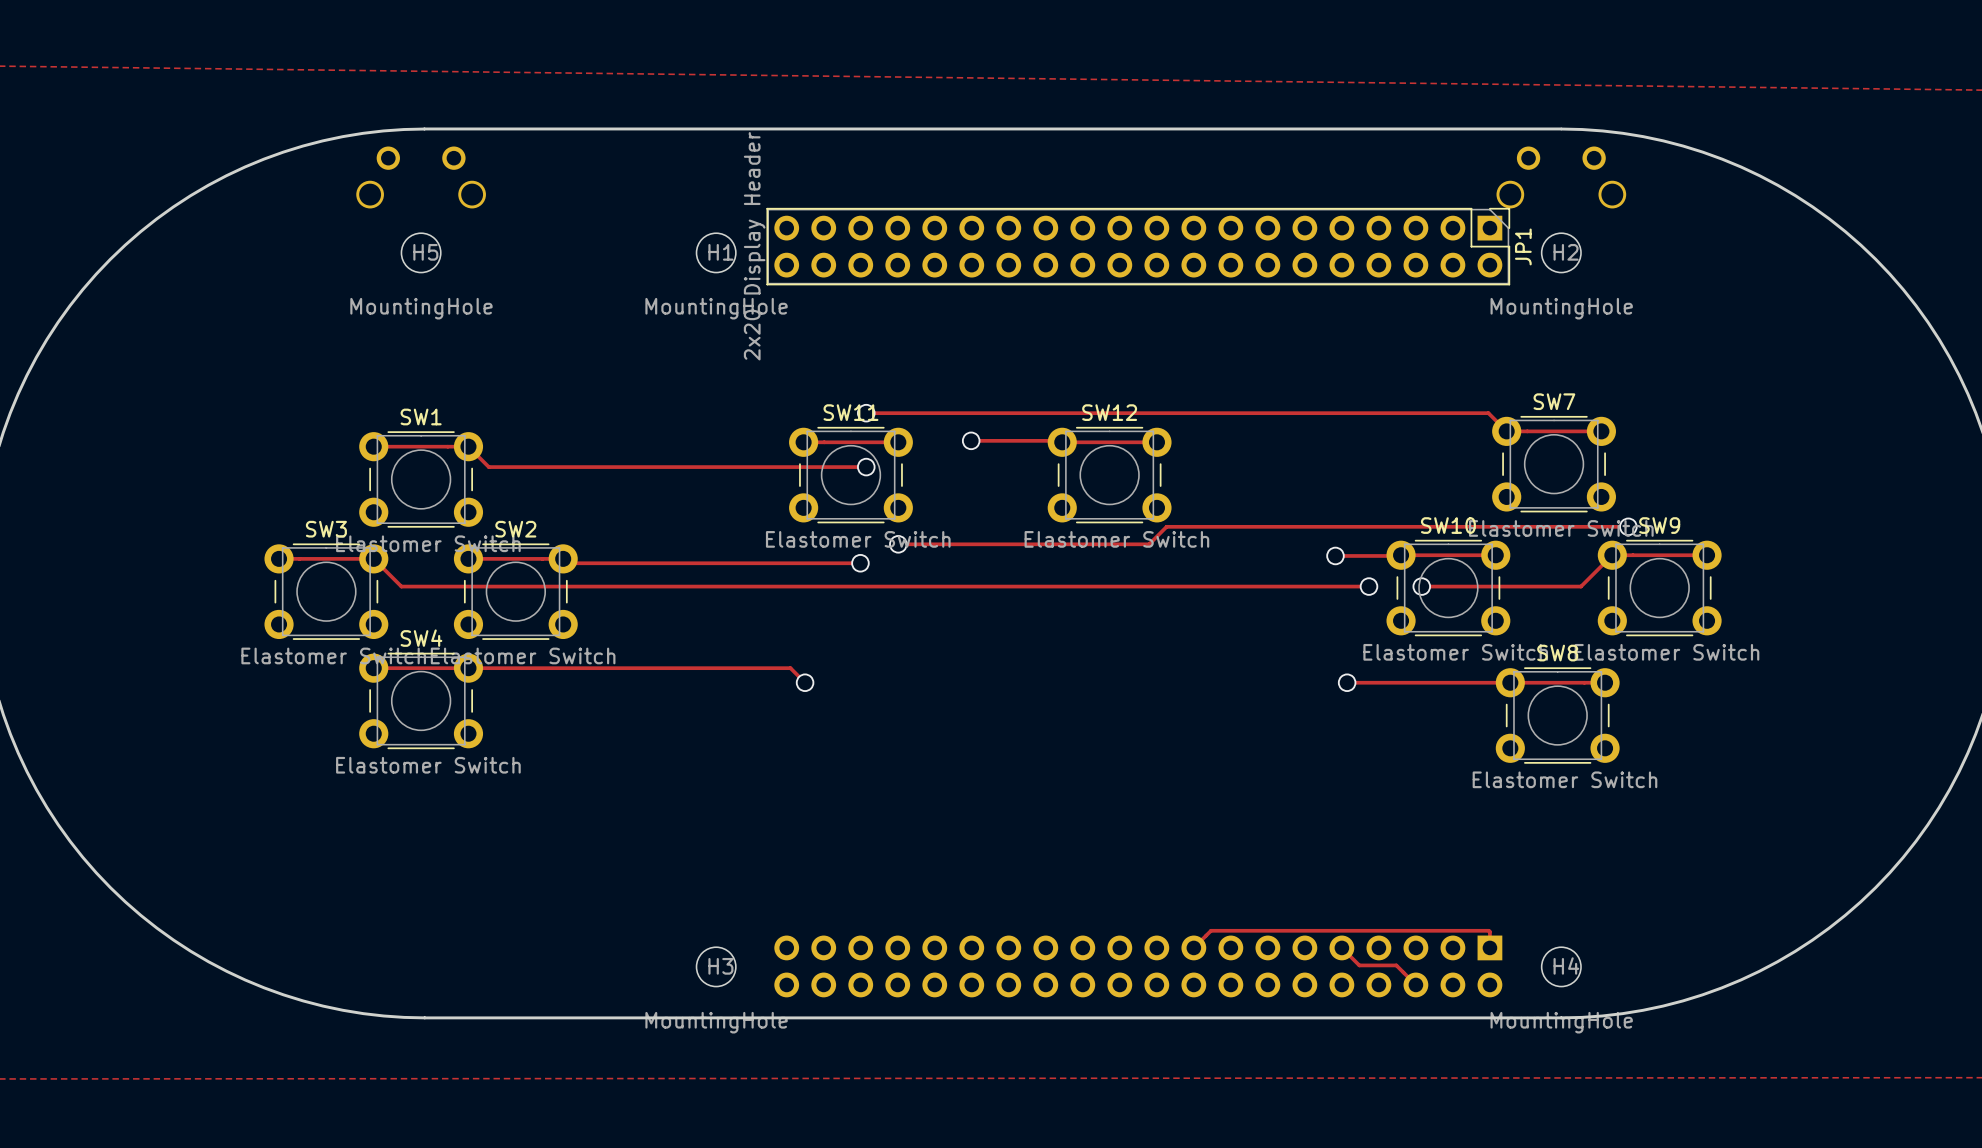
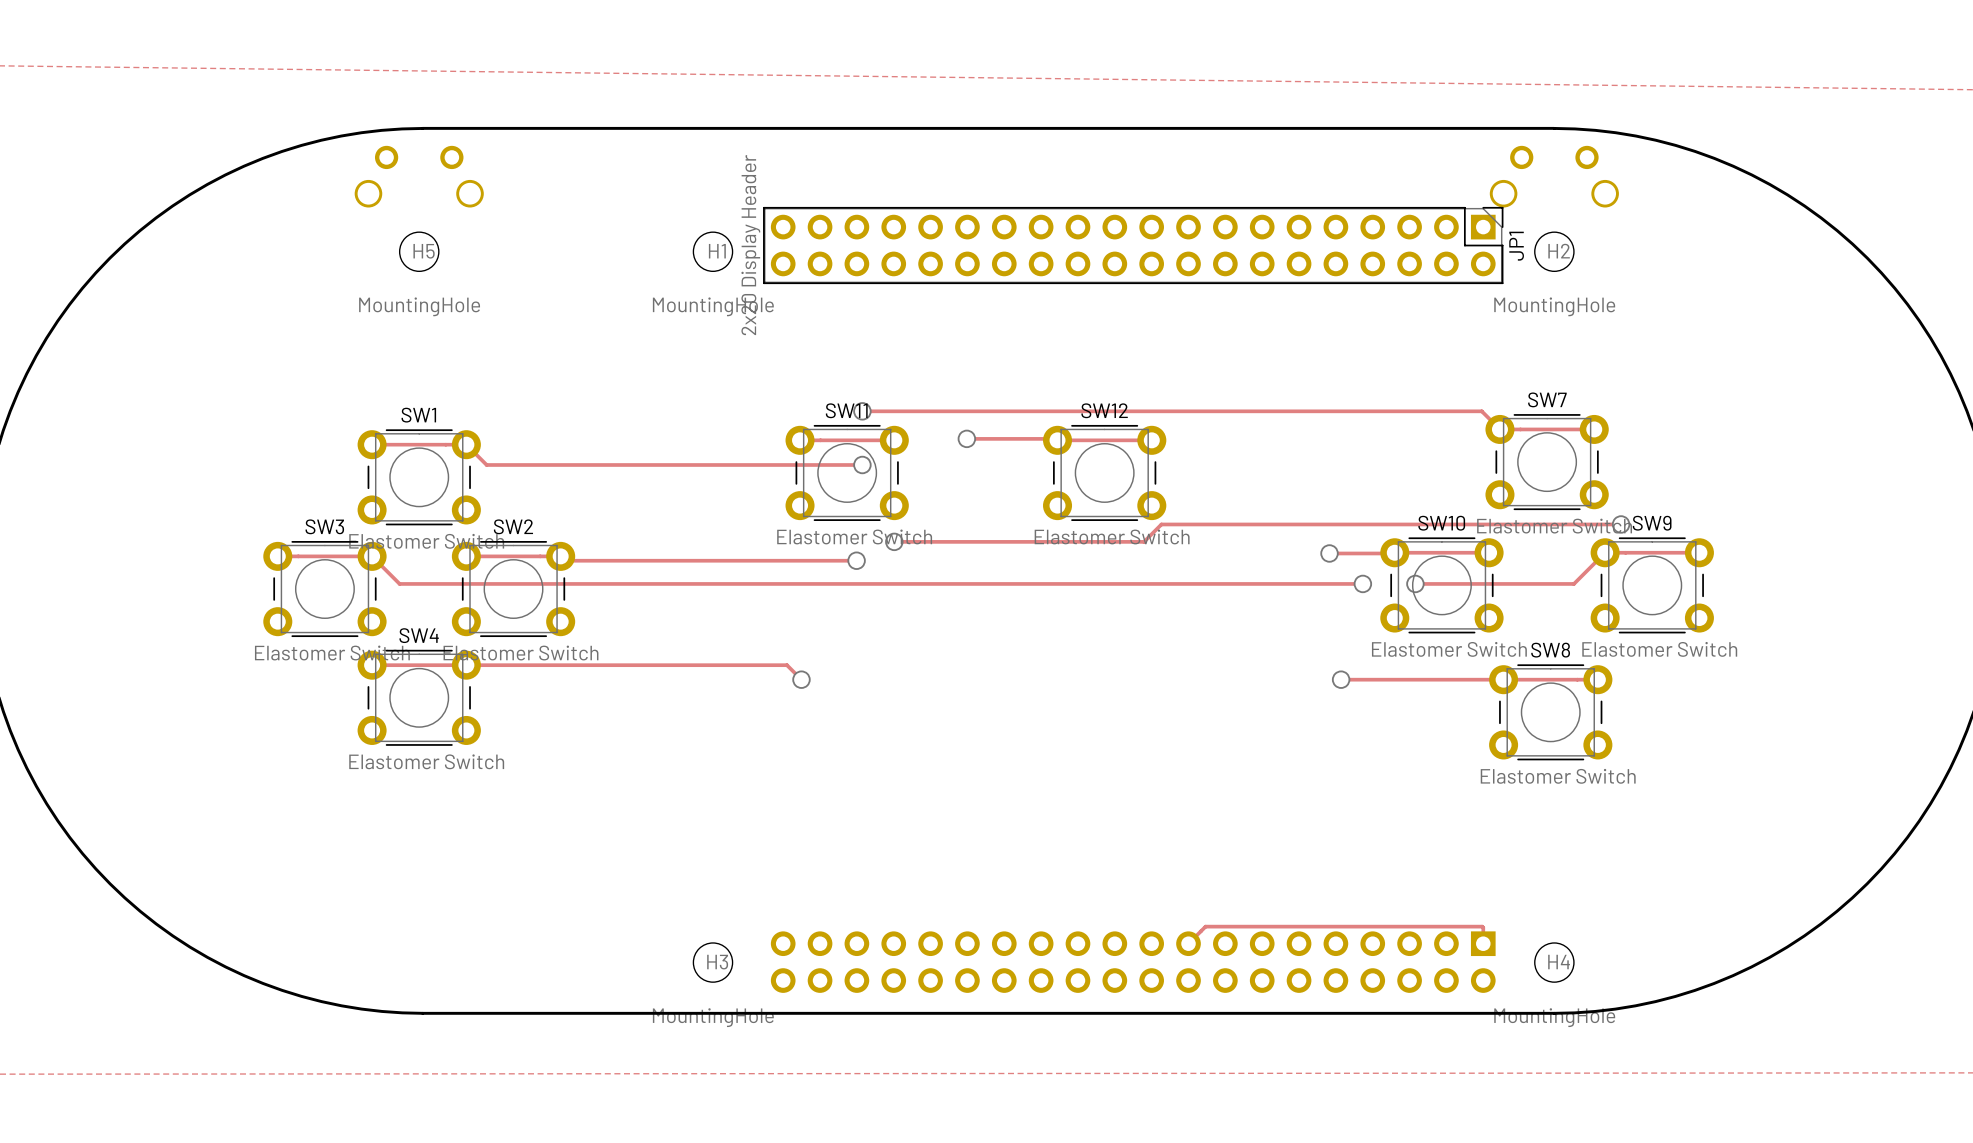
track: (1341, 947) (1359, 965) (1396, 965) (1415, 984) -> none

